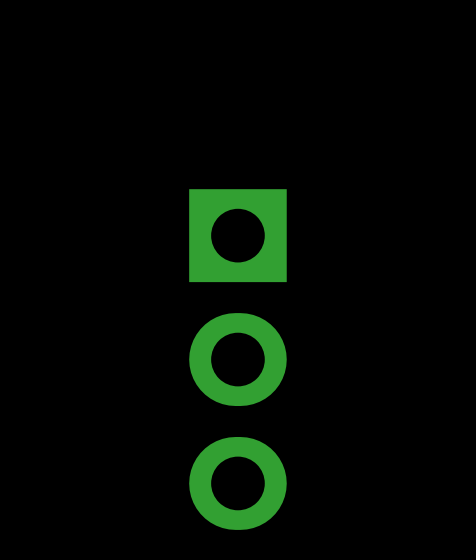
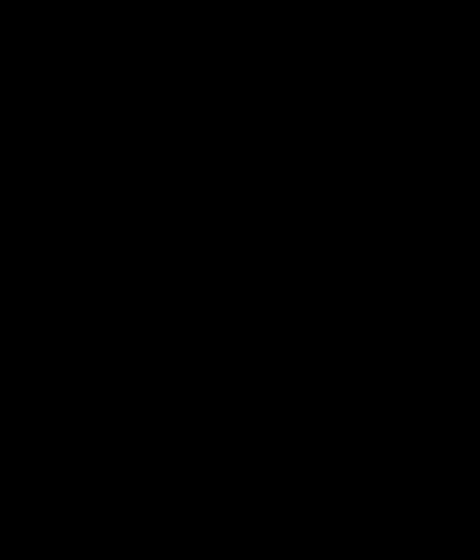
part: (237, 359) -> none

